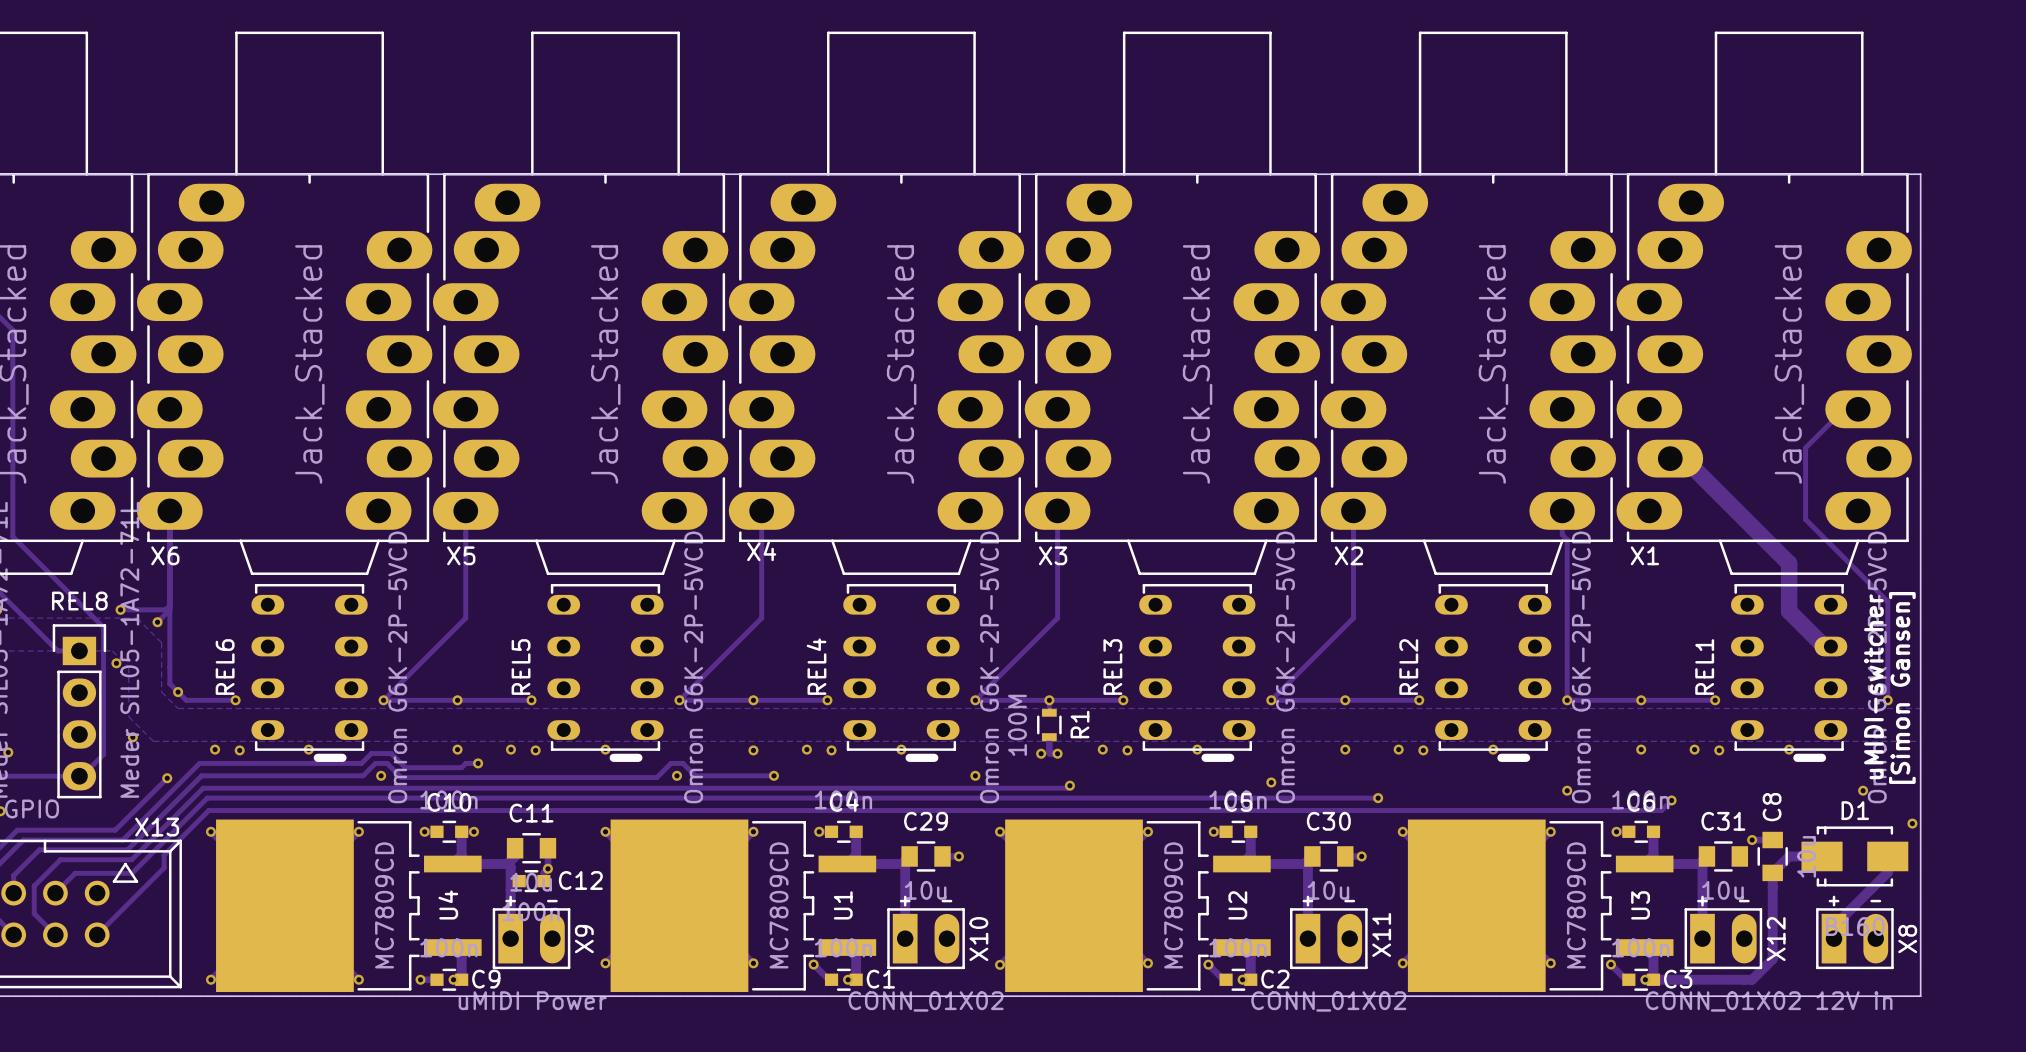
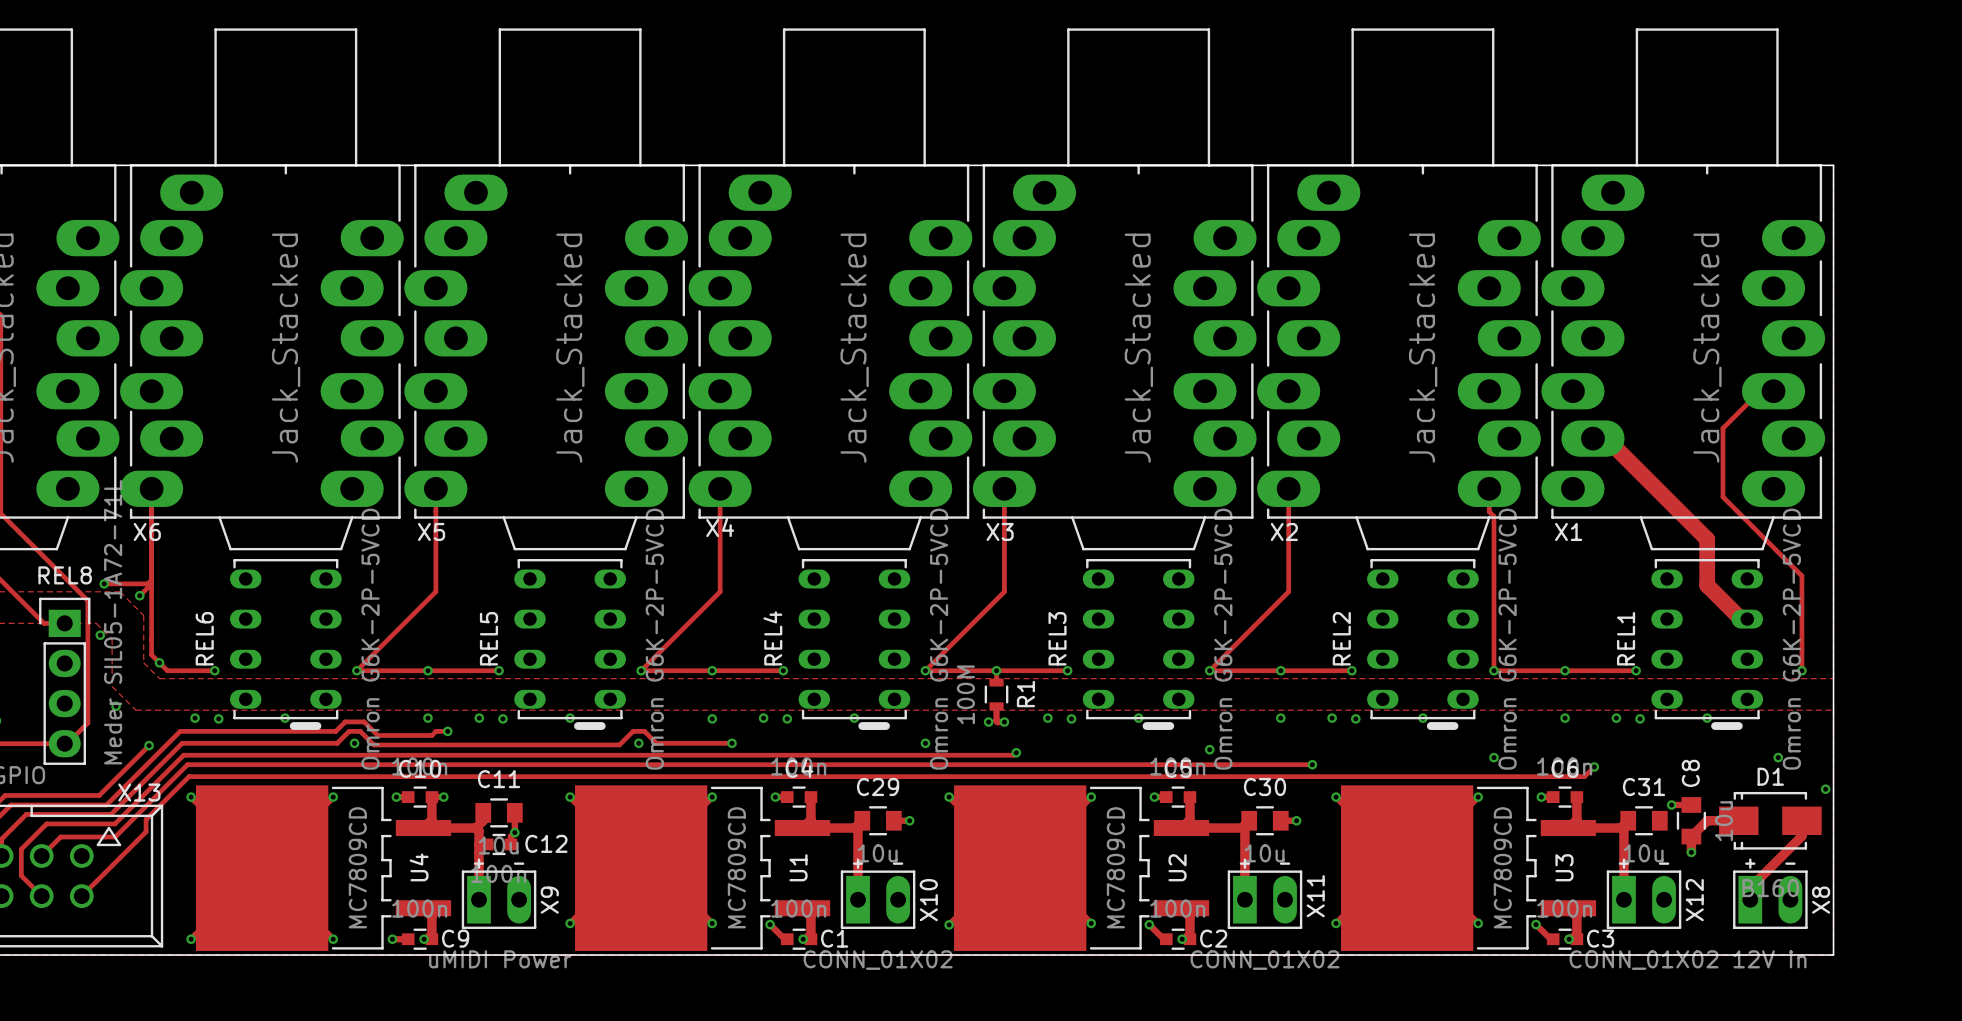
text: uMIDI-switcher (1873, 686) -> none
text: [Simon Gansen] (1902, 687) -> none
track: (1772, 889) (1772, 959) (1752, 979) (1653, 979) -> none
via: none -> (1691, 852)

